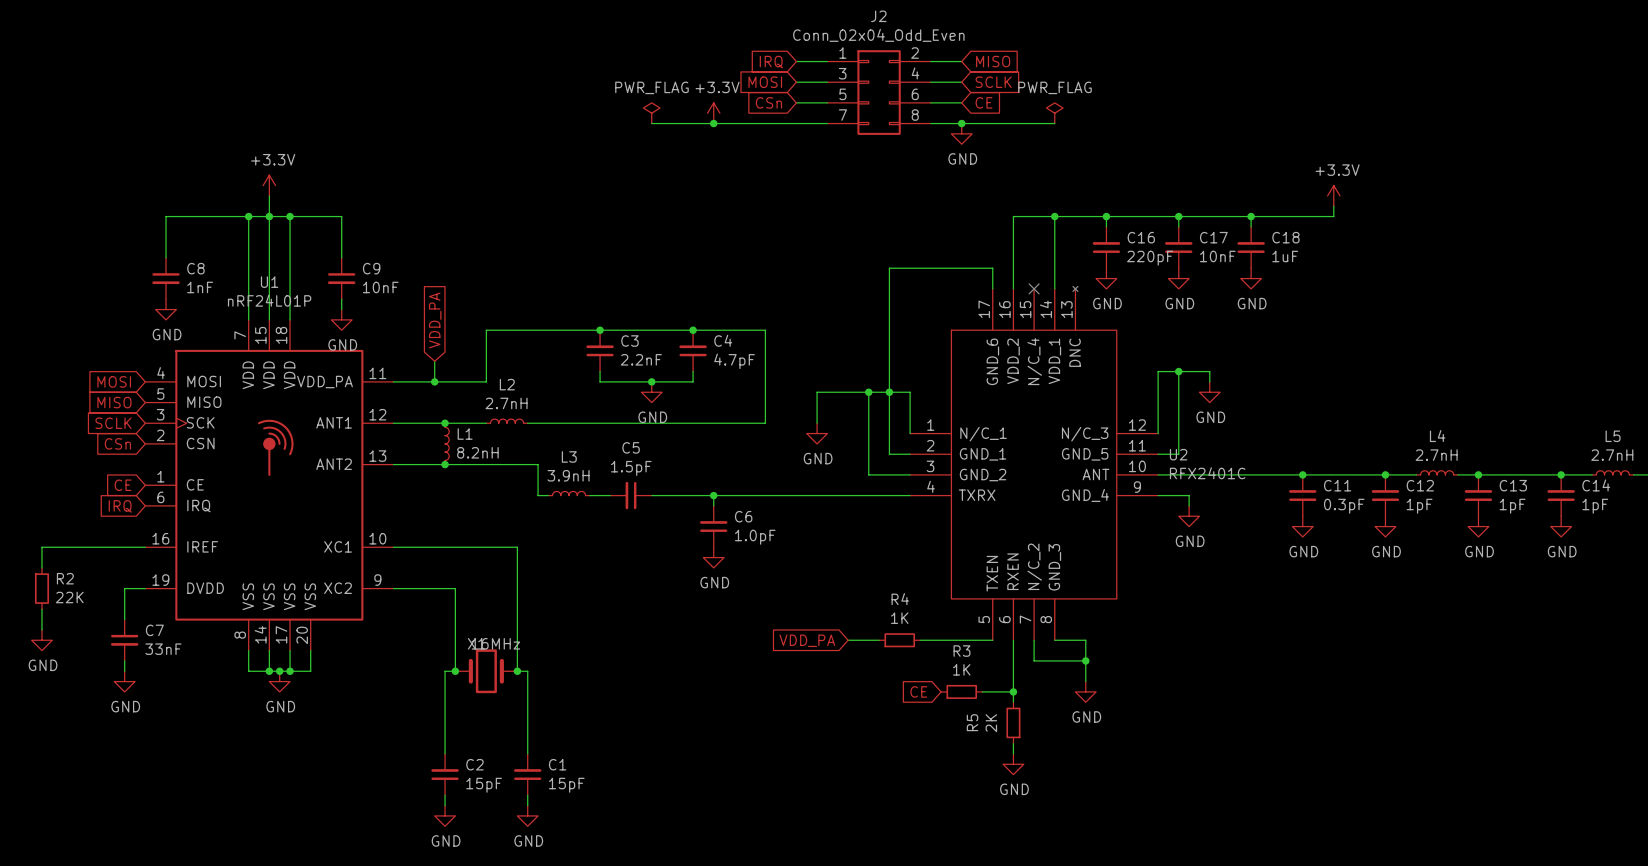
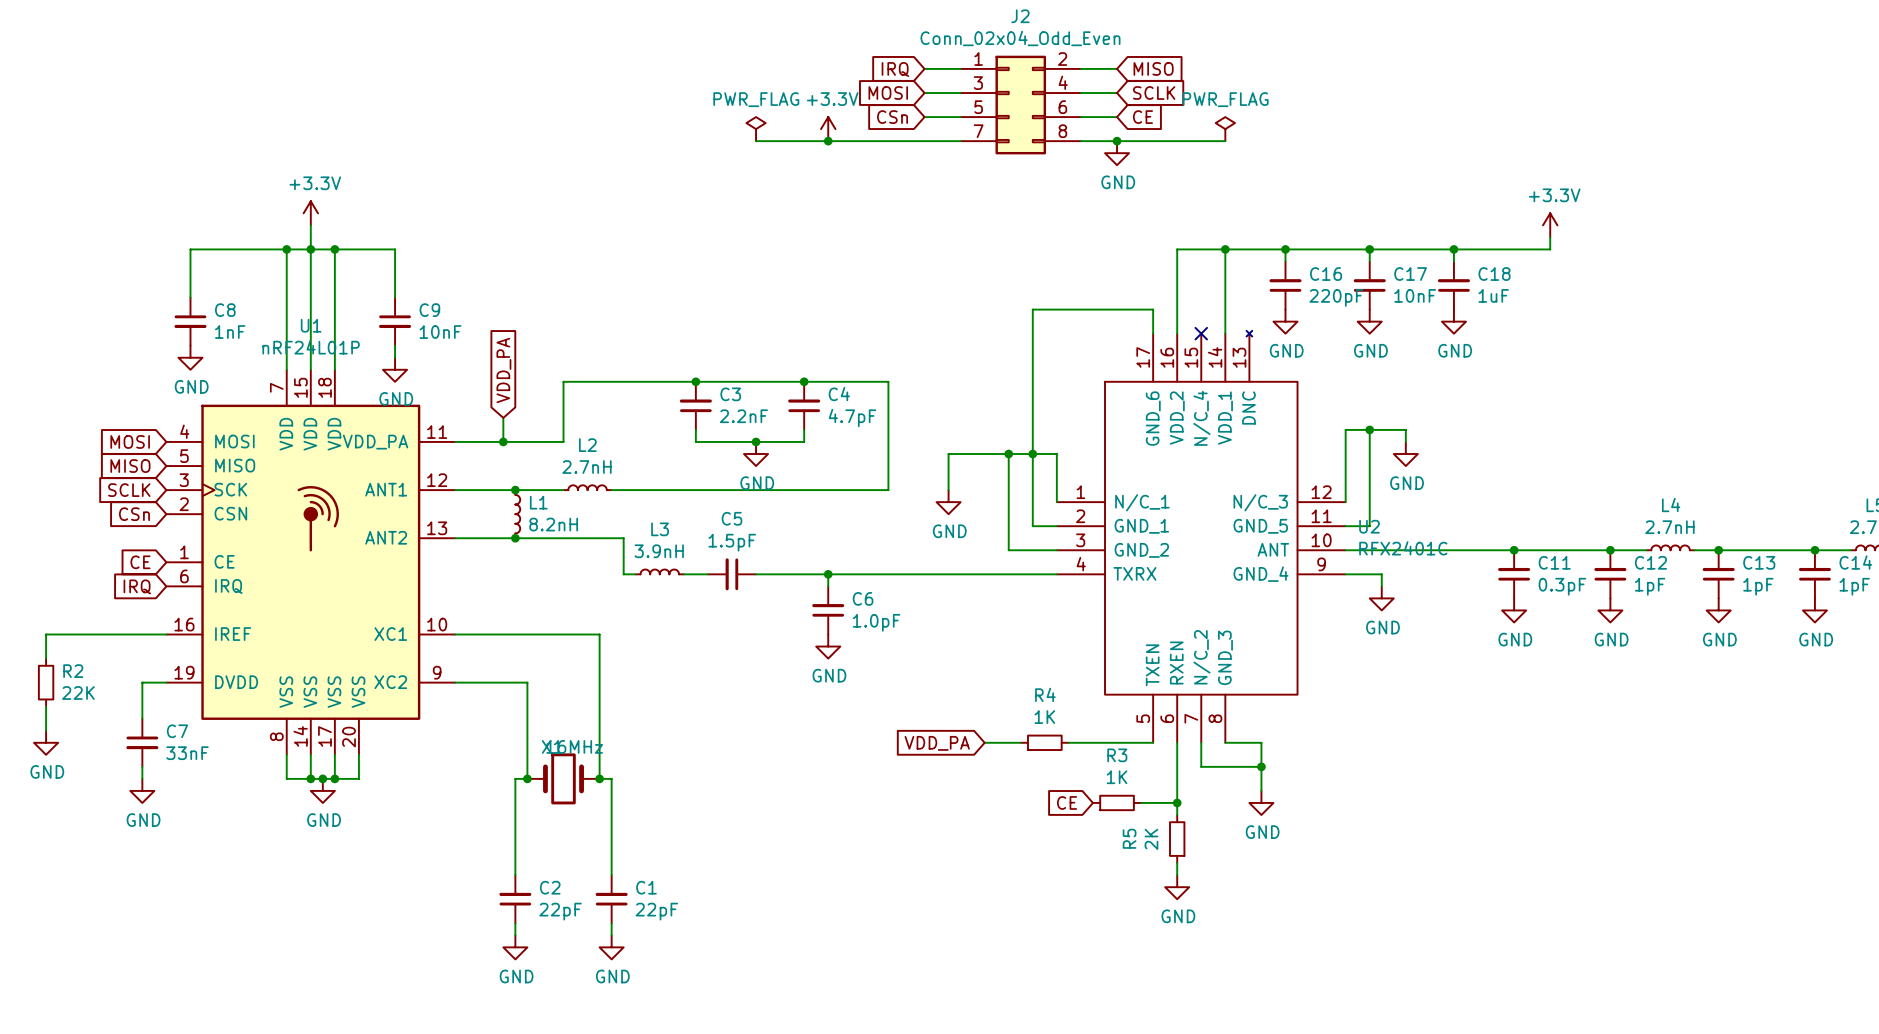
C2 value: 15pF (484, 785) -> 22pF (560, 911)
C1 value: 15pF (566, 785) -> 22pF (656, 911)

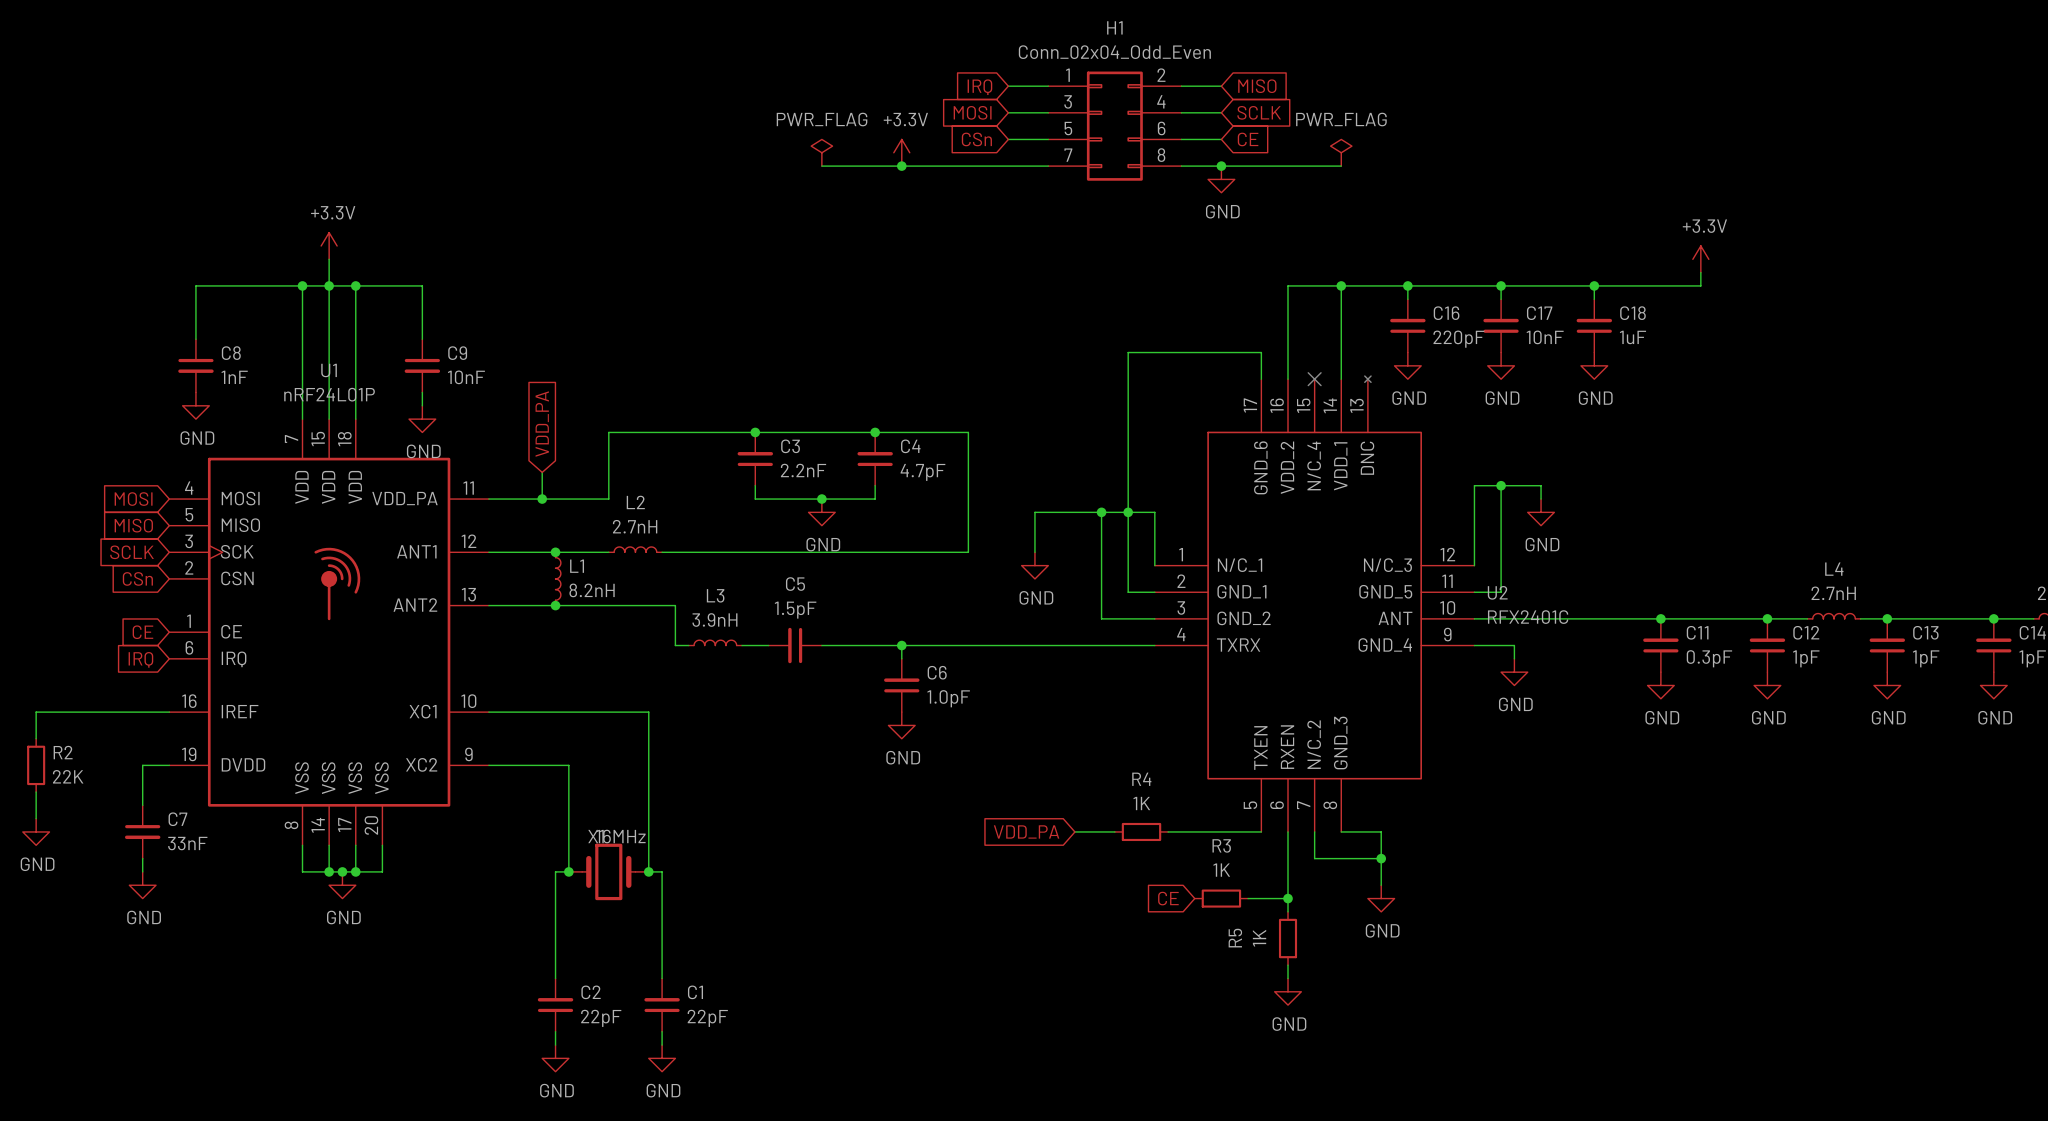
J2 name: J2 (1020, 16) -> H1 (1114, 27)
R5 value: 2K (1151, 839) -> 1K (1259, 938)

